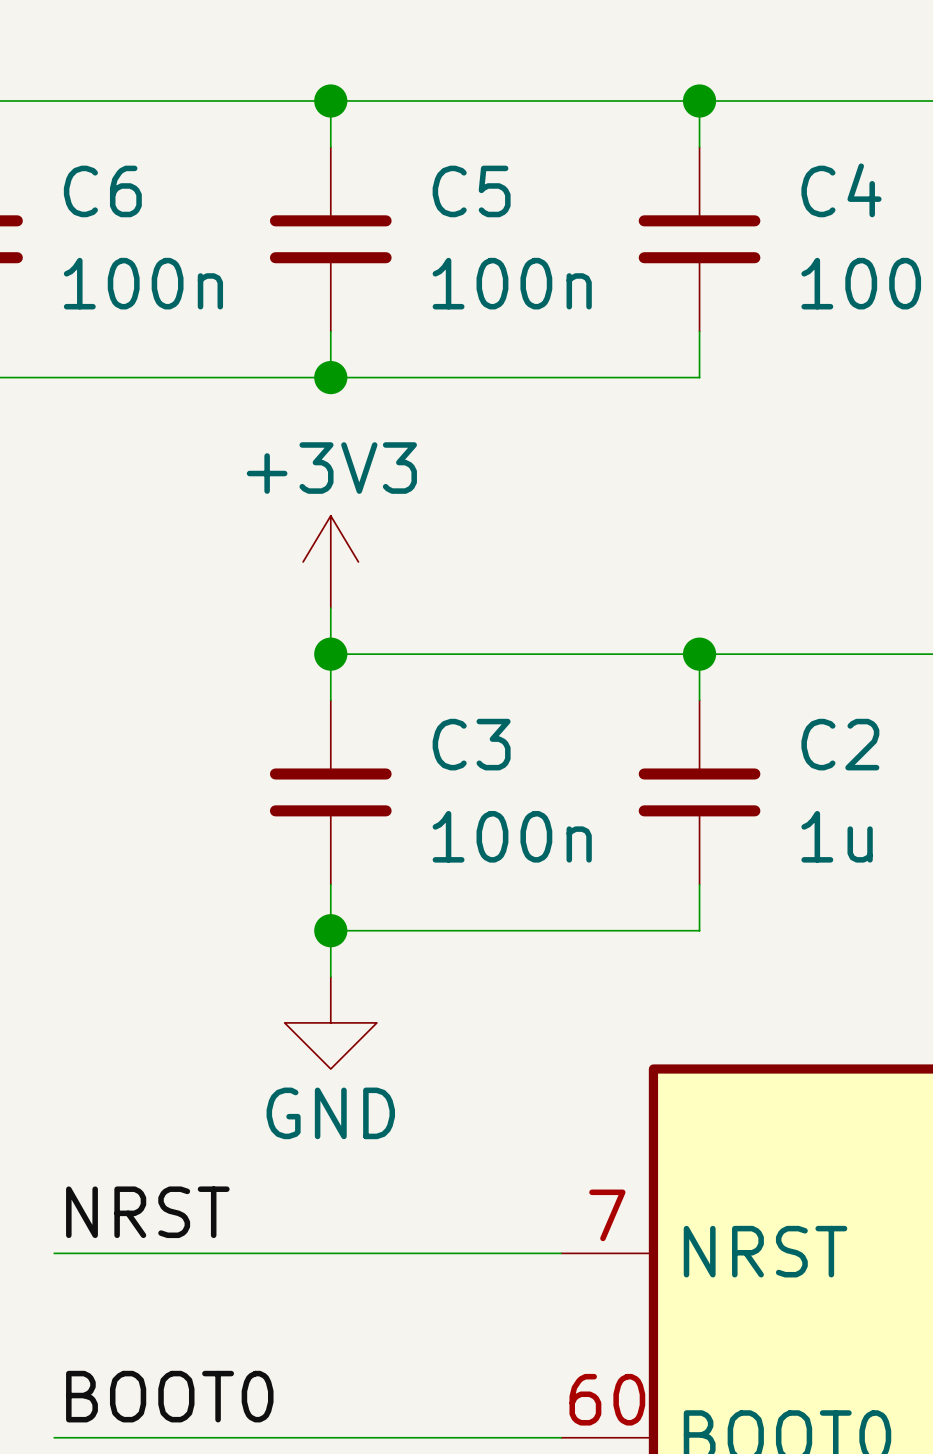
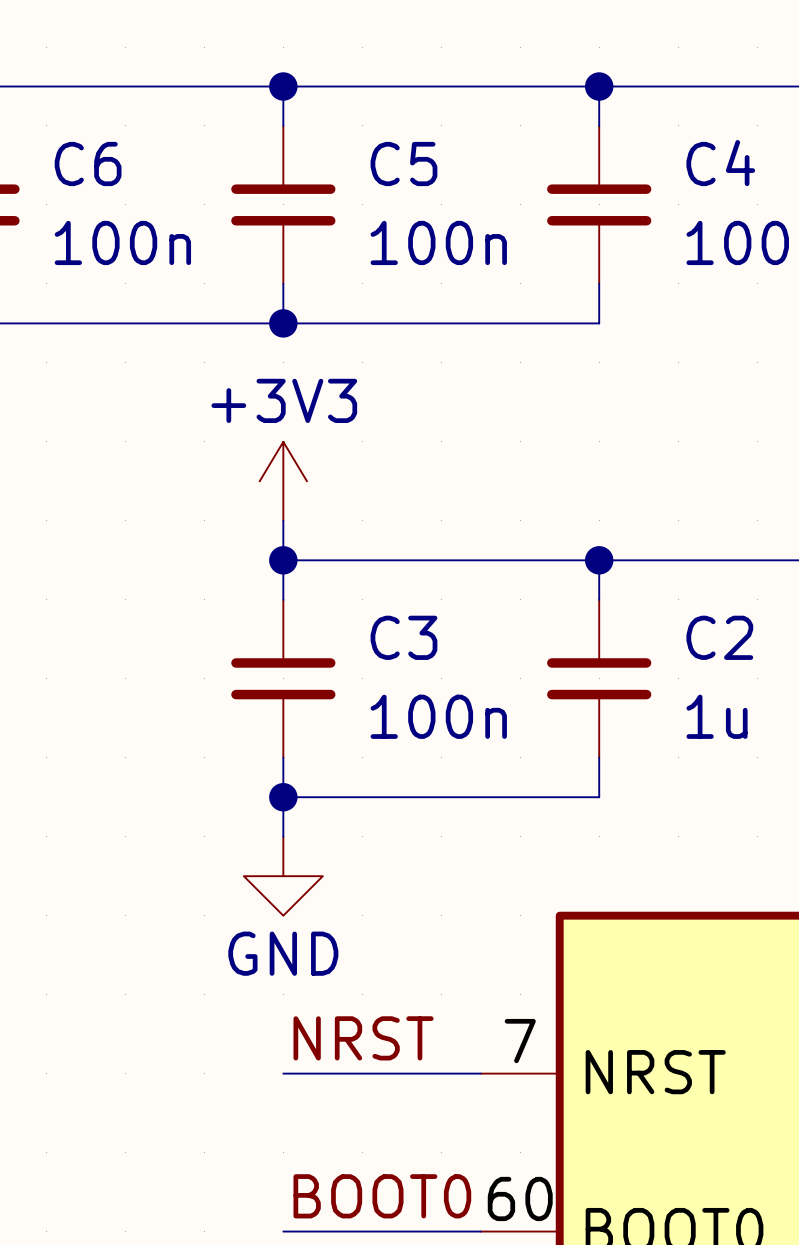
label position: NRST (147, 1212) -> NRST (363, 1038)
wire: (54, 1253) (330, 1253) -> none
label position: BOOT0 (169, 1396) -> BOOT0 (382, 1196)
wire: (54, 1437) (330, 1437) -> none

